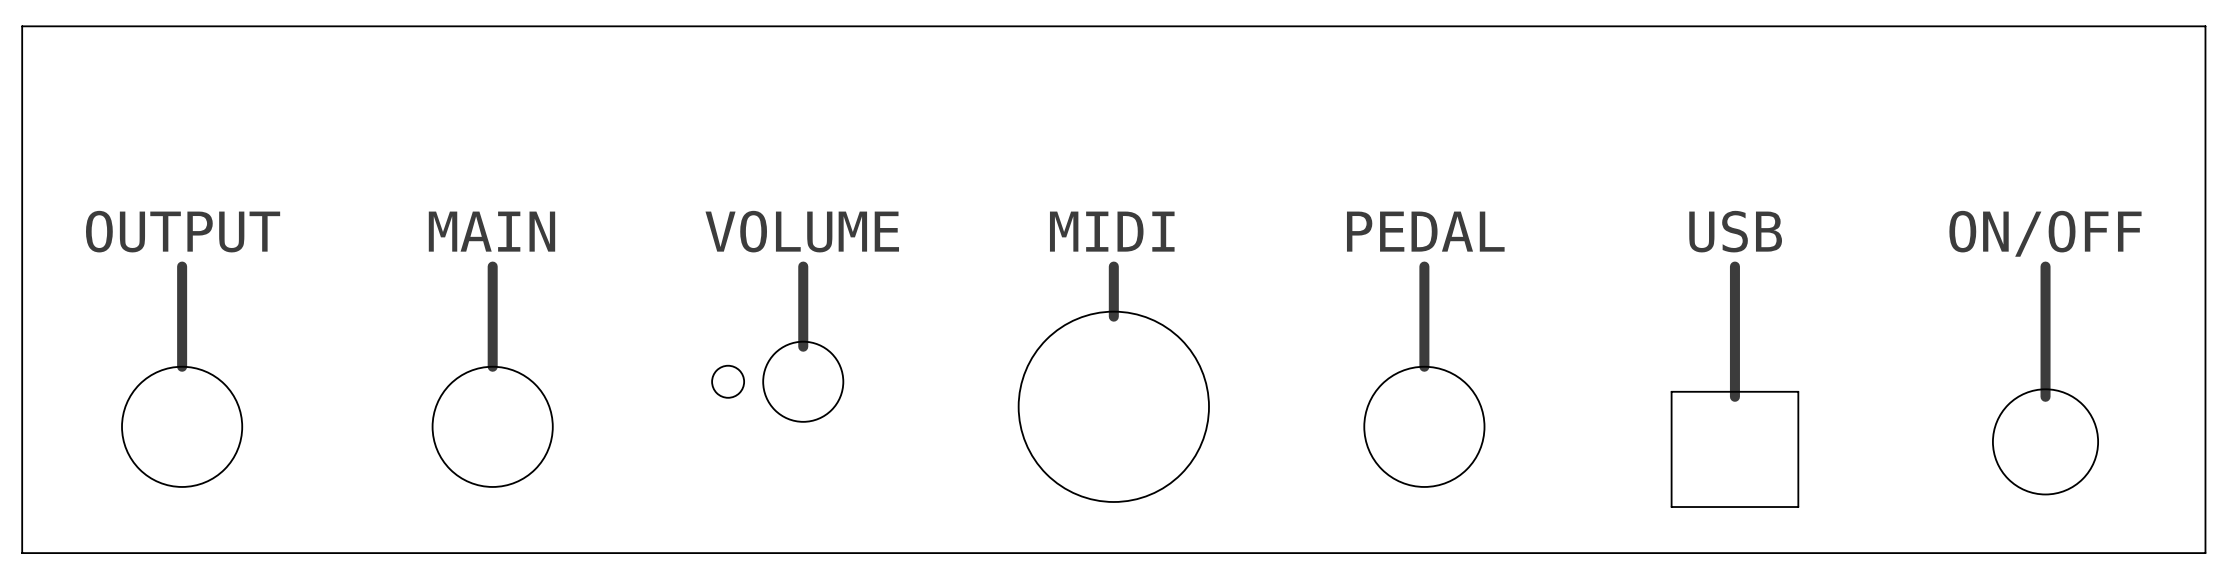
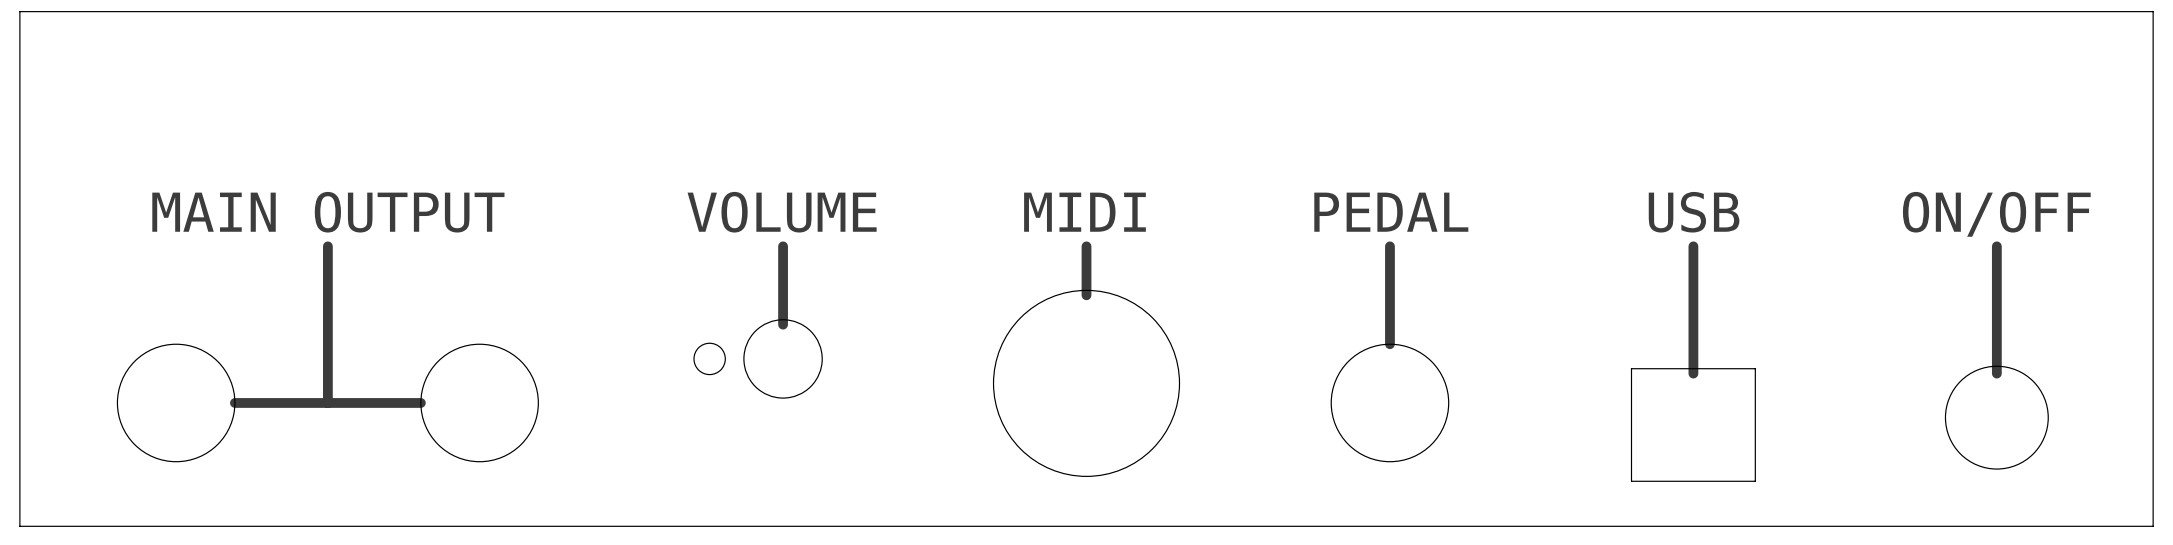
text: OUTPUT (183, 231) -> MAIN OUTPUT (328, 212)
text: MAIN (491, 231) -> none
line: (182, 266) (182, 366) -> none
line: none -> (327, 246) (327, 402)
line: (492, 266) (492, 366) -> none
line: none -> (234, 402) (420, 402)

